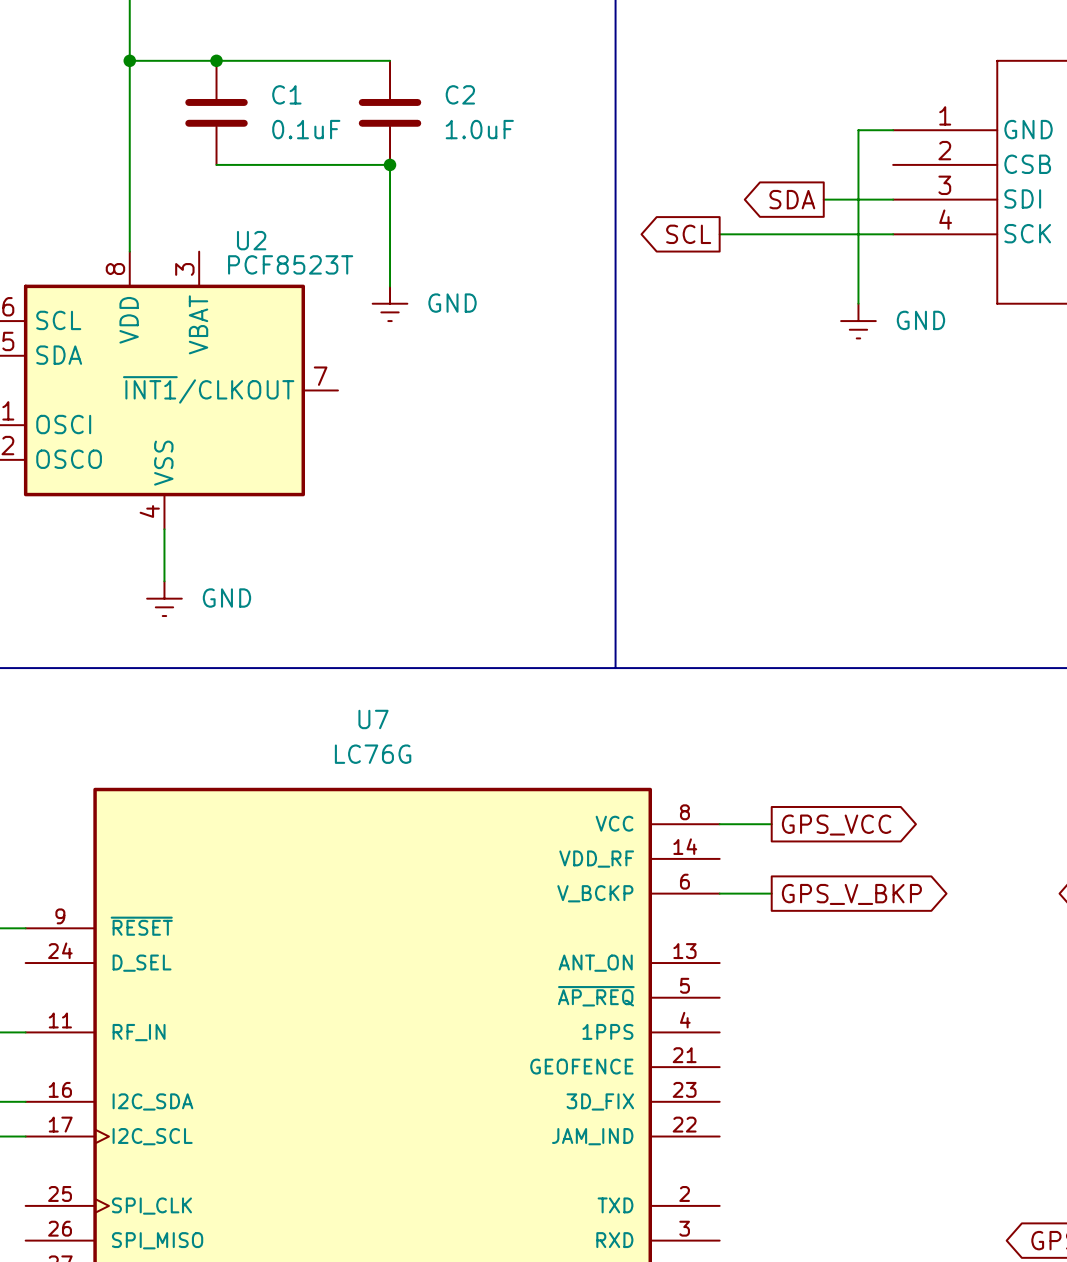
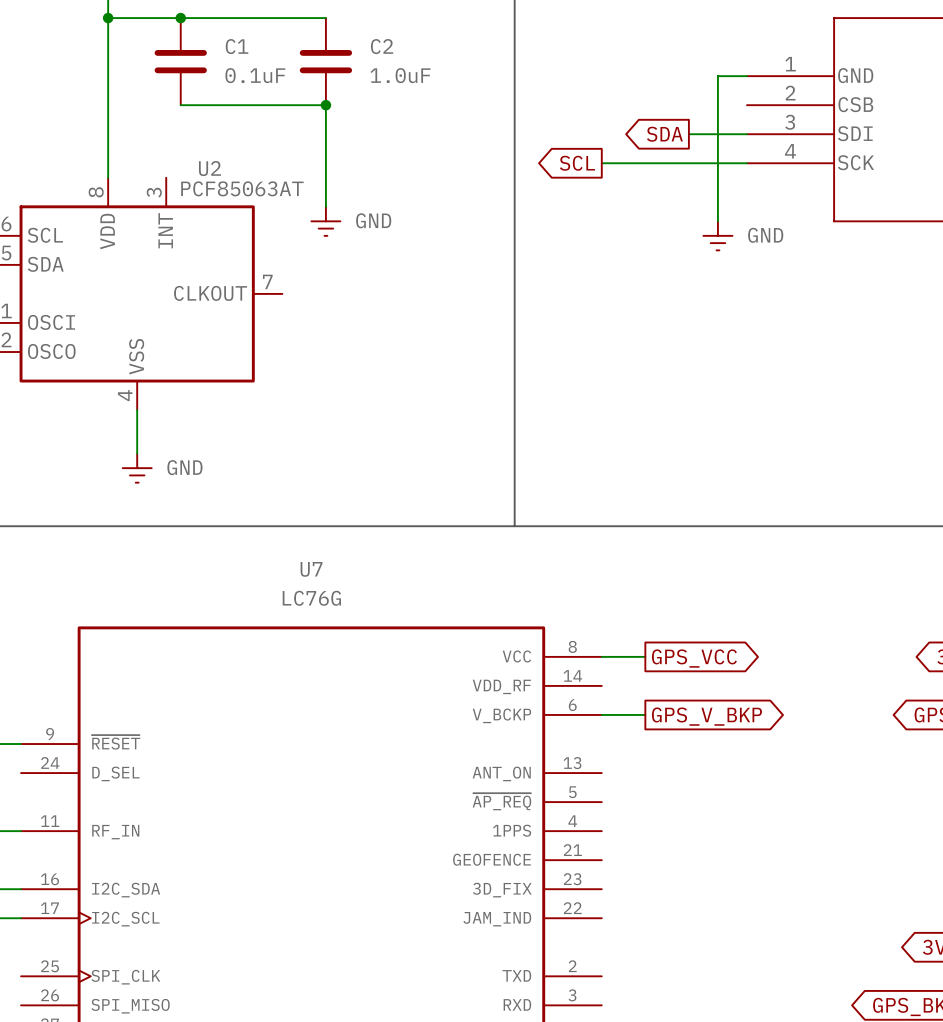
U2 value: PCF8523T (290, 264) -> PCF85063AT (242, 188)
U2 pin name: VBAT (198, 324) -> INT (165, 230)
U2 pin name: ~{INT1}/CLKOUT (208, 389) -> CLKOUT (210, 293)

